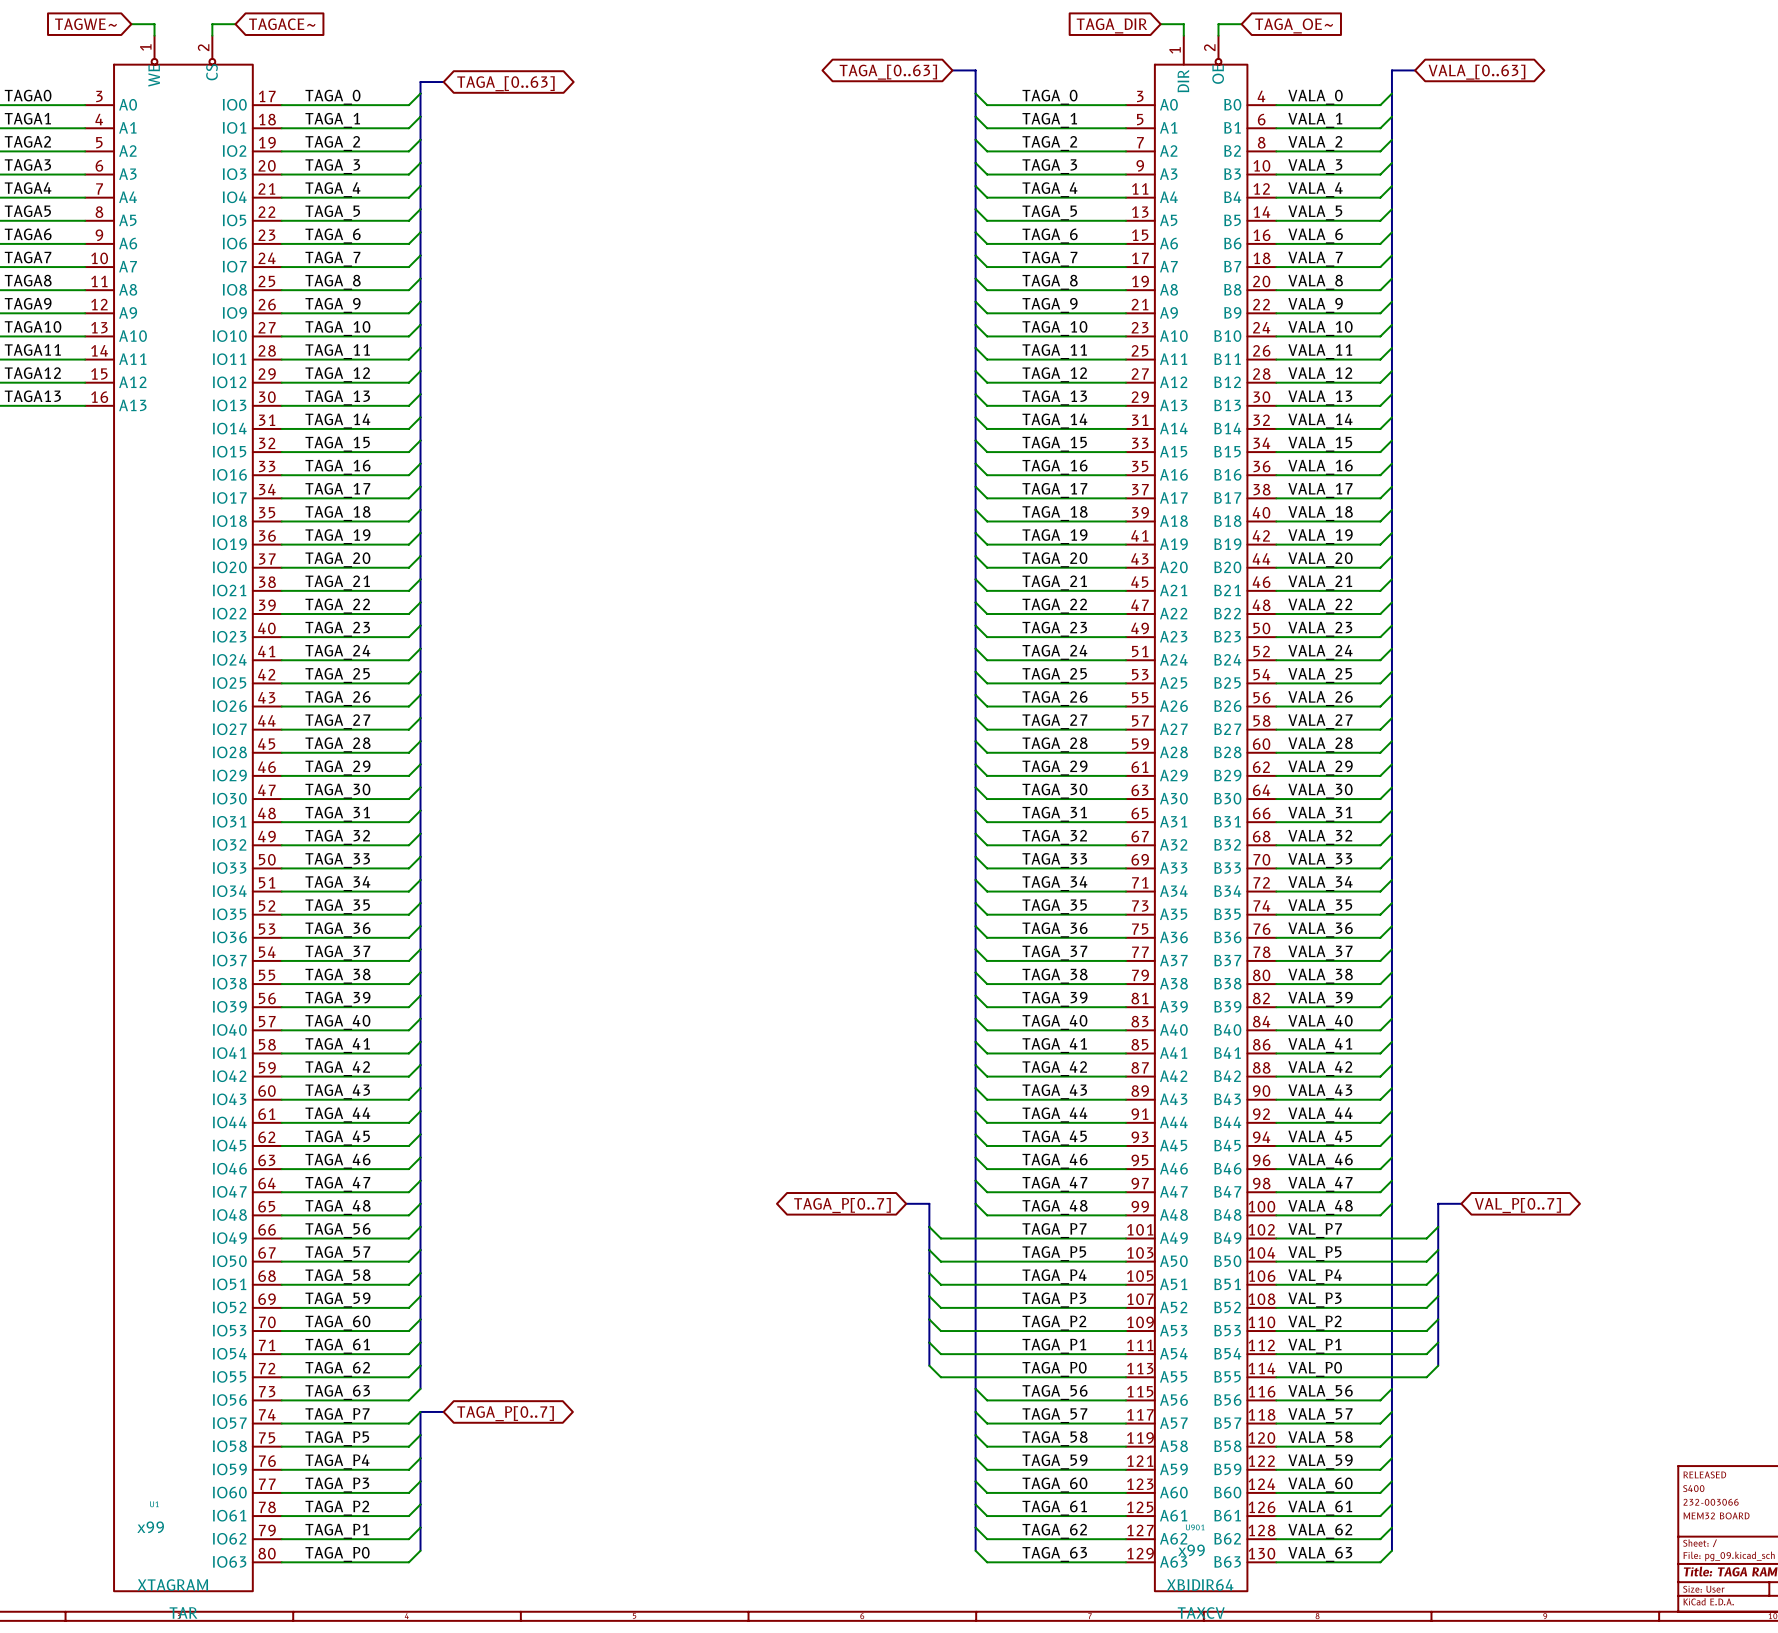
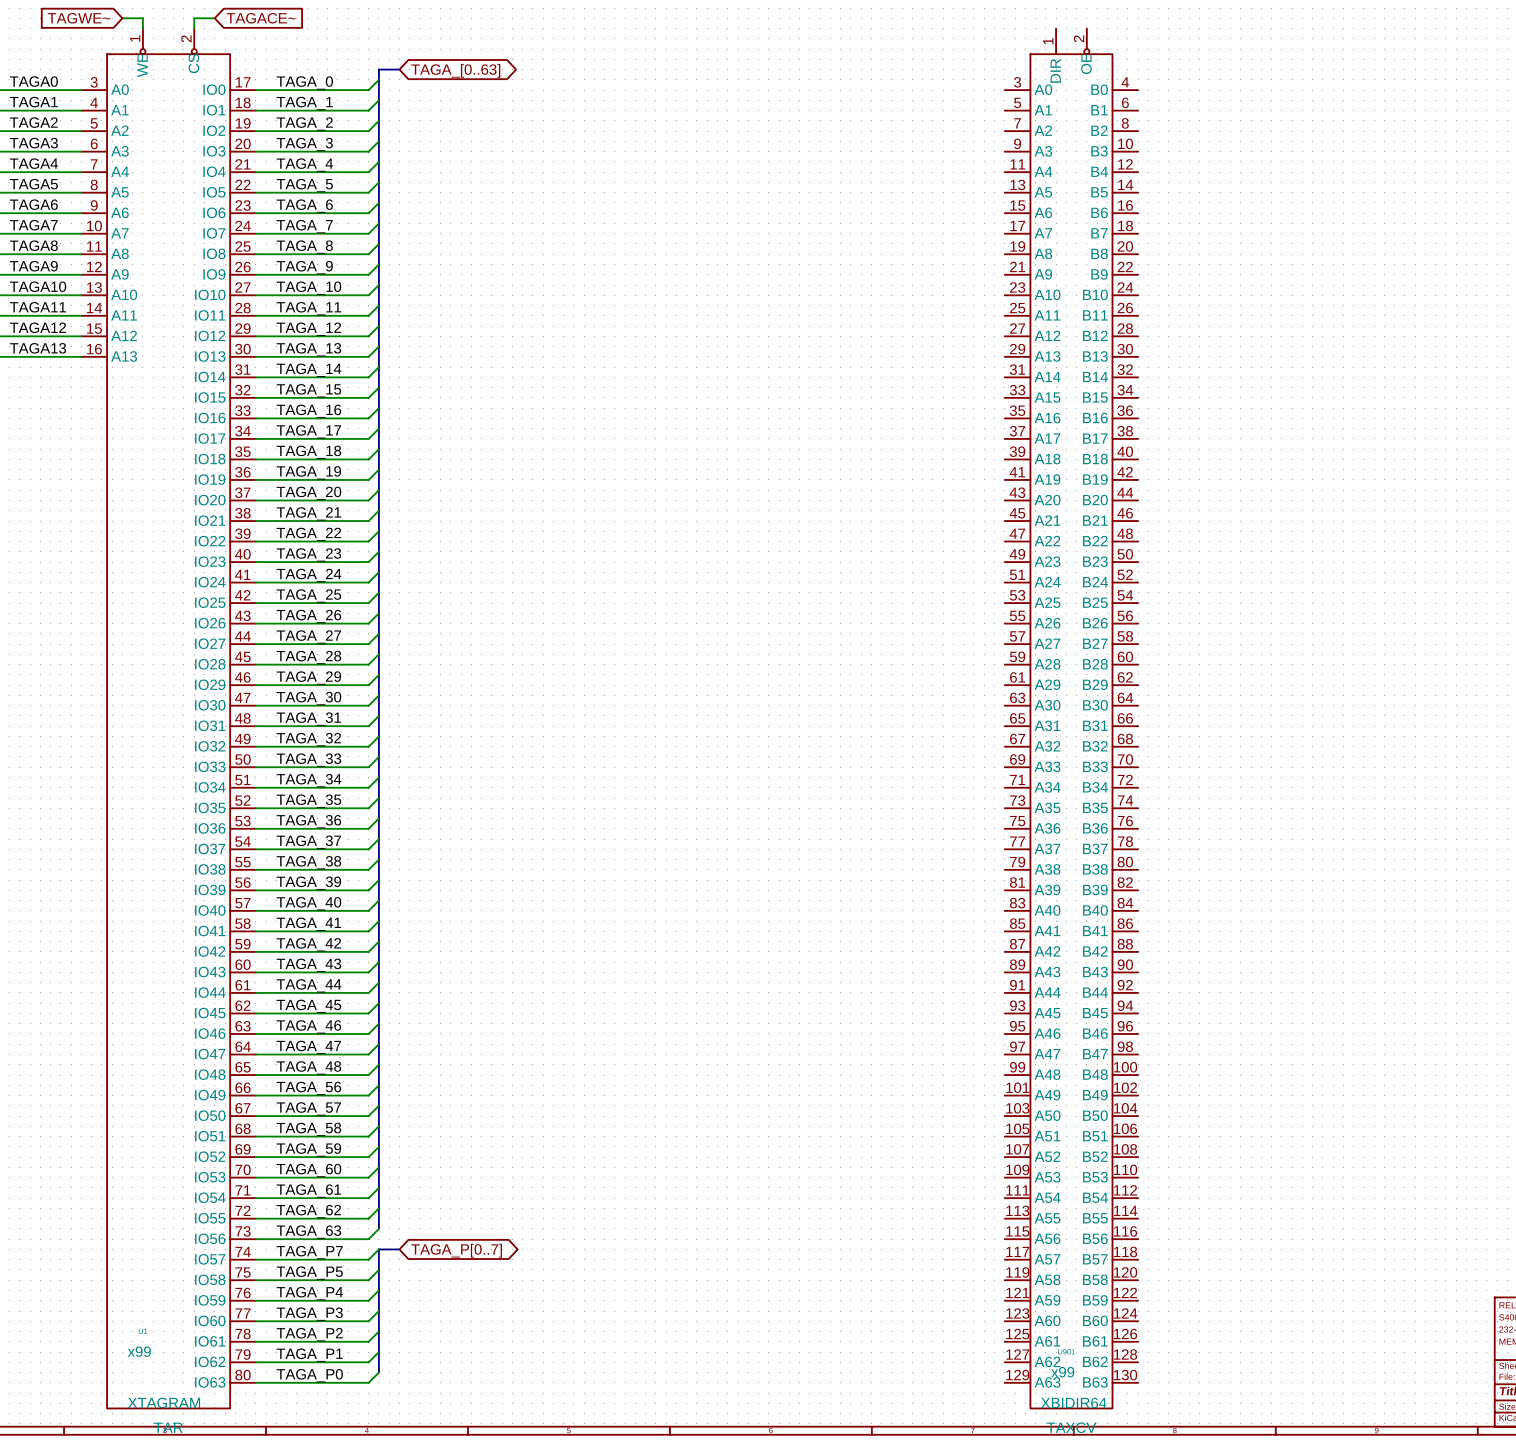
wire: (1160, 24) (1183, 24) (1183, 35) -> none
wire: (1241, 24) (1218, 24) (1218, 35) -> none
global label: TAGA_DIR (1111, 25) -> none
global label: TAGA_OE~ (1294, 25) -> none
bus: (952, 70) (975, 70) (975, 1550) -> none
bus: (1415, 70) (1391, 70) (1391, 1550) -> none
global label: TAGA_[0..63] (888, 72) -> none
global label: VALA_[0..63] (1477, 72) -> none
wire: (975, 93) (987, 105) (1125, 105) -> none
wire: (1391, 93) (1380, 105) (1276, 105) -> none
label: TAGA_0 (1050, 97) -> none
label: VALA_0 (1315, 97) -> none
wire: (975, 116) (987, 128) (1125, 128) -> none
wire: (1391, 116) (1380, 128) (1276, 128) -> none
label: TAGA_1 (1049, 120) -> none
label: VALA_1 (1315, 120) -> none
wire: (975, 139) (987, 151) (1125, 151) -> none
wire: (1391, 139) (1380, 151) (1276, 151) -> none
label: TAGA_2 (1049, 143) -> none
label: VALA_2 (1315, 143) -> none
wire: (975, 162) (987, 174) (1125, 174) -> none
wire: (1391, 162) (1380, 174) (1276, 174) -> none
label: TAGA_3 (1049, 166) -> none
label: VALA_3 (1315, 166) -> none
wire: (975, 186) (987, 197) (1125, 197) -> none
wire: (1391, 186) (1380, 197) (1276, 197) -> none
label: TAGA_4 (1049, 189) -> none
label: VALA_4 (1315, 189) -> none
wire: (975, 209) (987, 220) (1125, 220) -> none
wire: (1391, 209) (1380, 220) (1276, 220) -> none
label: TAGA_5 (1049, 212) -> none
label: VALA_5 (1315, 212) -> none
wire: (975, 232) (987, 243) (1125, 243) -> none
wire: (1391, 232) (1380, 243) (1276, 243) -> none
label: TAGA_6 (1050, 236) -> none
label: VALA_6 (1315, 236) -> none
wire: (975, 255) (987, 267) (1125, 267) -> none
wire: (1391, 255) (1380, 267) (1276, 267) -> none
label: TAGA_7 (1049, 259) -> none
label: VALA_7 (1315, 259) -> none
wire: (975, 278) (987, 290) (1125, 290) -> none
wire: (1391, 278) (1380, 290) (1276, 290) -> none
label: TAGA_8 (1050, 282) -> none
label: VALA_8 (1315, 282) -> none
wire: (975, 301) (987, 313) (1125, 313) -> none
wire: (1391, 301) (1380, 313) (1276, 313) -> none
label: TAGA_9 (1050, 305) -> none
label: VALA_9 (1315, 305) -> none
wire: (975, 324) (987, 336) (1125, 336) -> none
wire: (1391, 324) (1380, 336) (1276, 336) -> none
label: TAGA_10 (1054, 328) -> none
label: VALA_10 (1320, 328) -> none
wire: (975, 348) (987, 359) (1125, 359) -> none
wire: (1391, 348) (1380, 359) (1276, 359) -> none
label: TAGA_11 (1054, 351) -> none
label: VALA_11 (1320, 351) -> none
wire: (975, 371) (987, 382) (1125, 382) -> none
wire: (1391, 371) (1380, 382) (1276, 382) -> none
label: TAGA_12 (1054, 374) -> none
label: VALA_12 (1320, 374) -> none
wire: (975, 394) (987, 405) (1125, 405) -> none
wire: (1391, 394) (1380, 405) (1276, 405) -> none
label: TAGA_13 (1054, 397) -> none
label: VALA_13 (1320, 397) -> none
wire: (975, 417) (987, 428) (1125, 428) -> none
wire: (1391, 417) (1380, 428) (1276, 428) -> none
label: TAGA_14 (1054, 421) -> none
label: VALA_14 (1320, 421) -> none
wire: (975, 440) (987, 452) (1125, 452) -> none
wire: (1391, 440) (1380, 452) (1276, 452) -> none
label: TAGA_15 (1054, 444) -> none
label: VALA_15 (1320, 444) -> none
wire: (975, 463) (987, 475) (1125, 475) -> none
wire: (1391, 463) (1380, 475) (1276, 475) -> none
label: TAGA_16 (1055, 467) -> none
label: VALA_16 (1320, 467) -> none
wire: (975, 486) (987, 498) (1125, 498) -> none
wire: (1391, 486) (1380, 498) (1276, 498) -> none
label: TAGA_17 (1054, 490) -> none
label: VALA_17 (1320, 490) -> none
wire: (975, 509) (987, 521) (1125, 521) -> none
wire: (1391, 509) (1380, 521) (1276, 521) -> none
label: TAGA_18 (1055, 513) -> none
label: VALA_18 (1320, 513) -> none
wire: (975, 533) (987, 544) (1125, 544) -> none
wire: (1391, 533) (1380, 544) (1276, 544) -> none
label: TAGA_19 (1054, 536) -> none
label: VALA_19 (1320, 536) -> none
wire: (975, 556) (987, 567) (1125, 567) -> none
wire: (1391, 556) (1380, 567) (1276, 567) -> none
label: TAGA_20 (1054, 559) -> none
label: VALA_20 (1320, 559) -> none
wire: (975, 579) (987, 590) (1125, 590) -> none
wire: (1391, 579) (1380, 590) (1276, 590) -> none
label: TAGA_21 (1054, 582) -> none
label: VALA_21 (1320, 582) -> none
wire: (975, 602) (987, 613) (1125, 613) -> none
wire: (1391, 602) (1380, 613) (1276, 613) -> none
label: TAGA_22 (1054, 606) -> none
label: VALA_22 (1320, 606) -> none
wire: (975, 625) (987, 637) (1125, 637) -> none
wire: (1391, 625) (1380, 637) (1276, 637) -> none
label: TAGA_23 (1054, 629) -> none
label: VALA_23 (1320, 629) -> none
wire: (975, 648) (987, 660) (1125, 660) -> none
wire: (1391, 648) (1380, 660) (1276, 660) -> none
label: TAGA_24 (1054, 652) -> none
label: VALA_24 (1320, 652) -> none
wire: (975, 671) (987, 683) (1125, 683) -> none
wire: (1391, 671) (1380, 683) (1276, 683) -> none
label: TAGA_25 (1054, 675) -> none
label: VALA_25 (1320, 675) -> none
wire: (975, 694) (987, 706) (1125, 706) -> none
wire: (1391, 694) (1380, 706) (1276, 706) -> none
label: TAGA_26 (1055, 698) -> none
label: VALA_26 (1320, 698) -> none
wire: (975, 718) (987, 729) (1125, 729) -> none
wire: (1391, 718) (1380, 729) (1276, 729) -> none
label: TAGA_27 (1054, 721) -> none
label: VALA_27 (1320, 721) -> none
wire: (975, 741) (987, 752) (1125, 752) -> none
wire: (1391, 741) (1380, 752) (1276, 752) -> none
label: TAGA_28 (1055, 744) -> none
label: VALA_28 (1320, 744) -> none
wire: (975, 764) (987, 775) (1125, 775) -> none
wire: (1391, 764) (1380, 775) (1276, 775) -> none
label: TAGA_29 (1054, 768) -> none
label: VALA_29 (1320, 768) -> none
wire: (975, 787) (987, 799) (1125, 799) -> none
wire: (1391, 787) (1380, 799) (1276, 799) -> none
label: TAGA_30 (1054, 791) -> none
label: VALA_30 (1320, 791) -> none
wire: (975, 810) (987, 822) (1125, 822) -> none
wire: (1391, 810) (1380, 822) (1276, 822) -> none
label: TAGA_31 (1054, 814) -> none
label: VALA_31 (1320, 814) -> none
wire: (975, 833) (987, 845) (1125, 845) -> none
wire: (1391, 833) (1380, 845) (1276, 845) -> none
label: TAGA_32 (1054, 837) -> none
label: VALA_32 (1320, 837) -> none
wire: (975, 856) (987, 868) (1125, 868) -> none
wire: (1391, 856) (1380, 868) (1276, 868) -> none
label: TAGA_33 (1054, 860) -> none
label: VALA_33 (1320, 860) -> none
wire: (975, 879) (987, 891) (1125, 891) -> none
wire: (1391, 879) (1380, 891) (1276, 891) -> none
label: TAGA_34 (1054, 883) -> none
label: VALA_34 (1320, 883) -> none
wire: (975, 903) (987, 914) (1125, 914) -> none
wire: (1391, 903) (1380, 914) (1276, 914) -> none
label: TAGA_35 (1054, 906) -> none
label: VALA_35 (1320, 906) -> none
wire: (975, 926) (987, 937) (1125, 937) -> none
wire: (1391, 926) (1380, 937) (1276, 937) -> none
label: TAGA_36 (1055, 929) -> none
label: VALA_36 (1320, 929) -> none
wire: (975, 949) (987, 960) (1125, 960) -> none
wire: (1391, 949) (1380, 960) (1276, 960) -> none
label: TAGA_37 (1054, 953) -> none
label: VALA_37 (1320, 953) -> none
wire: (975, 972) (987, 984) (1125, 984) -> none
wire: (1391, 972) (1380, 984) (1276, 984) -> none
label: TAGA_38 (1055, 976) -> none
label: VALA_38 (1320, 976) -> none
wire: (975, 995) (987, 1007) (1125, 1007) -> none
wire: (1391, 995) (1380, 1007) (1276, 1007) -> none
label: TAGA_39 (1054, 999) -> none
label: VALA_39 (1320, 999) -> none
wire: (975, 1018) (987, 1030) (1125, 1030) -> none
wire: (1391, 1018) (1380, 1030) (1276, 1030) -> none
label: TAGA_40 (1054, 1022) -> none
label: VALA_40 (1320, 1022) -> none
wire: (975, 1041) (987, 1053) (1125, 1053) -> none
wire: (1391, 1041) (1380, 1053) (1276, 1053) -> none
label: TAGA_41 (1054, 1045) -> none
label: VALA_41 (1320, 1045) -> none
wire: (975, 1065) (987, 1076) (1125, 1076) -> none
wire: (1391, 1065) (1380, 1076) (1276, 1076) -> none
label: TAGA_42 (1054, 1068) -> none
label: VALA_42 (1320, 1068) -> none
wire: (975, 1088) (987, 1099) (1125, 1099) -> none
wire: (1391, 1088) (1380, 1099) (1276, 1099) -> none
label: TAGA_43 (1054, 1091) -> none
label: VALA_43 (1320, 1091) -> none
wire: (975, 1111) (987, 1122) (1125, 1122) -> none
wire: (1391, 1111) (1380, 1122) (1276, 1122) -> none
label: TAGA_44 (1054, 1114) -> none
label: VALA_44 (1320, 1114) -> none
wire: (975, 1134) (987, 1145) (1125, 1145) -> none
wire: (1391, 1134) (1380, 1145) (1276, 1145) -> none
label: TAGA_45 (1054, 1138) -> none
label: VALA_45 (1320, 1138) -> none
wire: (975, 1157) (987, 1169) (1125, 1169) -> none
wire: (1391, 1157) (1380, 1169) (1276, 1169) -> none
label: TAGA_46 (1055, 1161) -> none
label: VALA_46 (1320, 1161) -> none
wire: (975, 1180) (987, 1192) (1125, 1192) -> none
wire: (1391, 1180) (1380, 1192) (1276, 1192) -> none
label: TAGA_47 (1054, 1184) -> none
label: VALA_47 (1320, 1184) -> none
bus: (906, 1203) (929, 1203) (929, 1365) -> none
wire: (975, 1203) (987, 1215) (1125, 1215) -> none
wire: (1391, 1203) (1380, 1215) (1276, 1215) -> none
bus: (1461, 1203) (1438, 1203) (1438, 1365) -> none
global label: TAGA_P[0..7] (842, 1205) -> none
global label: VAL_P[0..7] (1517, 1205) -> none
label: TAGA_48 (1055, 1207) -> none
label: VALA_48 (1320, 1207) -> none
wire: (929, 1226) (940, 1238) (1125, 1238) -> none
wire: (1438, 1226) (1426, 1238) (1276, 1238) -> none
label: TAGA_P7 (1054, 1230) -> none
label: VAL_P7 (1315, 1230) -> none
wire: (929, 1250) (940, 1261) (1125, 1261) -> none
wire: (1438, 1250) (1426, 1261) (1276, 1261) -> none
label: TAGA_P5 (1054, 1253) -> none
label: VAL_P5 (1314, 1253) -> none
wire: (929, 1273) (940, 1284) (1125, 1284) -> none
wire: (1438, 1273) (1426, 1284) (1276, 1284) -> none
label: TAGA_P4 (1054, 1276) -> none
label: VAL_P4 (1315, 1276) -> none
wire: (929, 1296) (940, 1307) (1125, 1307) -> none
wire: (1438, 1296) (1426, 1307) (1276, 1307) -> none
label: TAGA_P3 (1054, 1299) -> none
label: VAL_P3 (1314, 1299) -> none
wire: (929, 1319) (940, 1331) (1125, 1331) -> none
wire: (1438, 1319) (1426, 1331) (1276, 1331) -> none
label: TAGA_P2 (1054, 1323) -> none
label: VAL_P2 (1314, 1323) -> none
wire: (929, 1342) (940, 1354) (1125, 1354) -> none
wire: (1438, 1342) (1426, 1354) (1276, 1354) -> none
label: TAGA_P1 (1054, 1346) -> none
label: VAL_P1 (1314, 1346) -> none
wire: (929, 1365) (940, 1377) (1125, 1377) -> none
wire: (1438, 1365) (1426, 1377) (1276, 1377) -> none
label: TAGA_P0 (1054, 1369) -> none
label: VAL_P0 (1315, 1369) -> none
wire: (975, 1388) (987, 1400) (1125, 1400) -> none
wire: (1391, 1388) (1380, 1400) (1276, 1400) -> none
label: TAGA_56 (1055, 1392) -> none
label: VALA_56 (1320, 1392) -> none
wire: (975, 1411) (987, 1423) (1125, 1423) -> none
wire: (1391, 1411) (1380, 1423) (1276, 1423) -> none
label: TAGA_57 (1054, 1415) -> none
label: VALA_57 (1320, 1415) -> none
wire: (975, 1435) (987, 1446) (1125, 1446) -> none
wire: (1391, 1435) (1380, 1446) (1276, 1446) -> none
label: TAGA_58 (1055, 1438) -> none
label: VALA_58 (1320, 1438) -> none
wire: (975, 1458) (987, 1469) (1125, 1469) -> none
wire: (1391, 1458) (1380, 1469) (1276, 1469) -> none
label: TAGA_59 (1054, 1461) -> none
label: VALA_59 (1320, 1461) -> none
wire: (975, 1481) (987, 1492) (1125, 1492) -> none
wire: (1391, 1481) (1380, 1492) (1276, 1492) -> none
label: TAGA_60 (1054, 1485) -> none
label: VALA_60 (1320, 1485) -> none
wire: (975, 1504) (987, 1516) (1125, 1516) -> none
wire: (1391, 1504) (1380, 1516) (1276, 1516) -> none
label: TAGA_61 (1054, 1508) -> none
label: VALA_61 (1320, 1508) -> none
wire: (975, 1527) (987, 1539) (1125, 1539) -> none
wire: (1391, 1527) (1380, 1539) (1276, 1539) -> none
label: TAGA_62 (1054, 1531) -> none
label: VALA_62 (1320, 1531) -> none
wire: (975, 1550) (987, 1562) (1125, 1562) -> none
wire: (1391, 1550) (1380, 1562) (1276, 1562) -> none
label: TAGA_63 (1054, 1554) -> none
label: VALA_63 (1320, 1554) -> none

